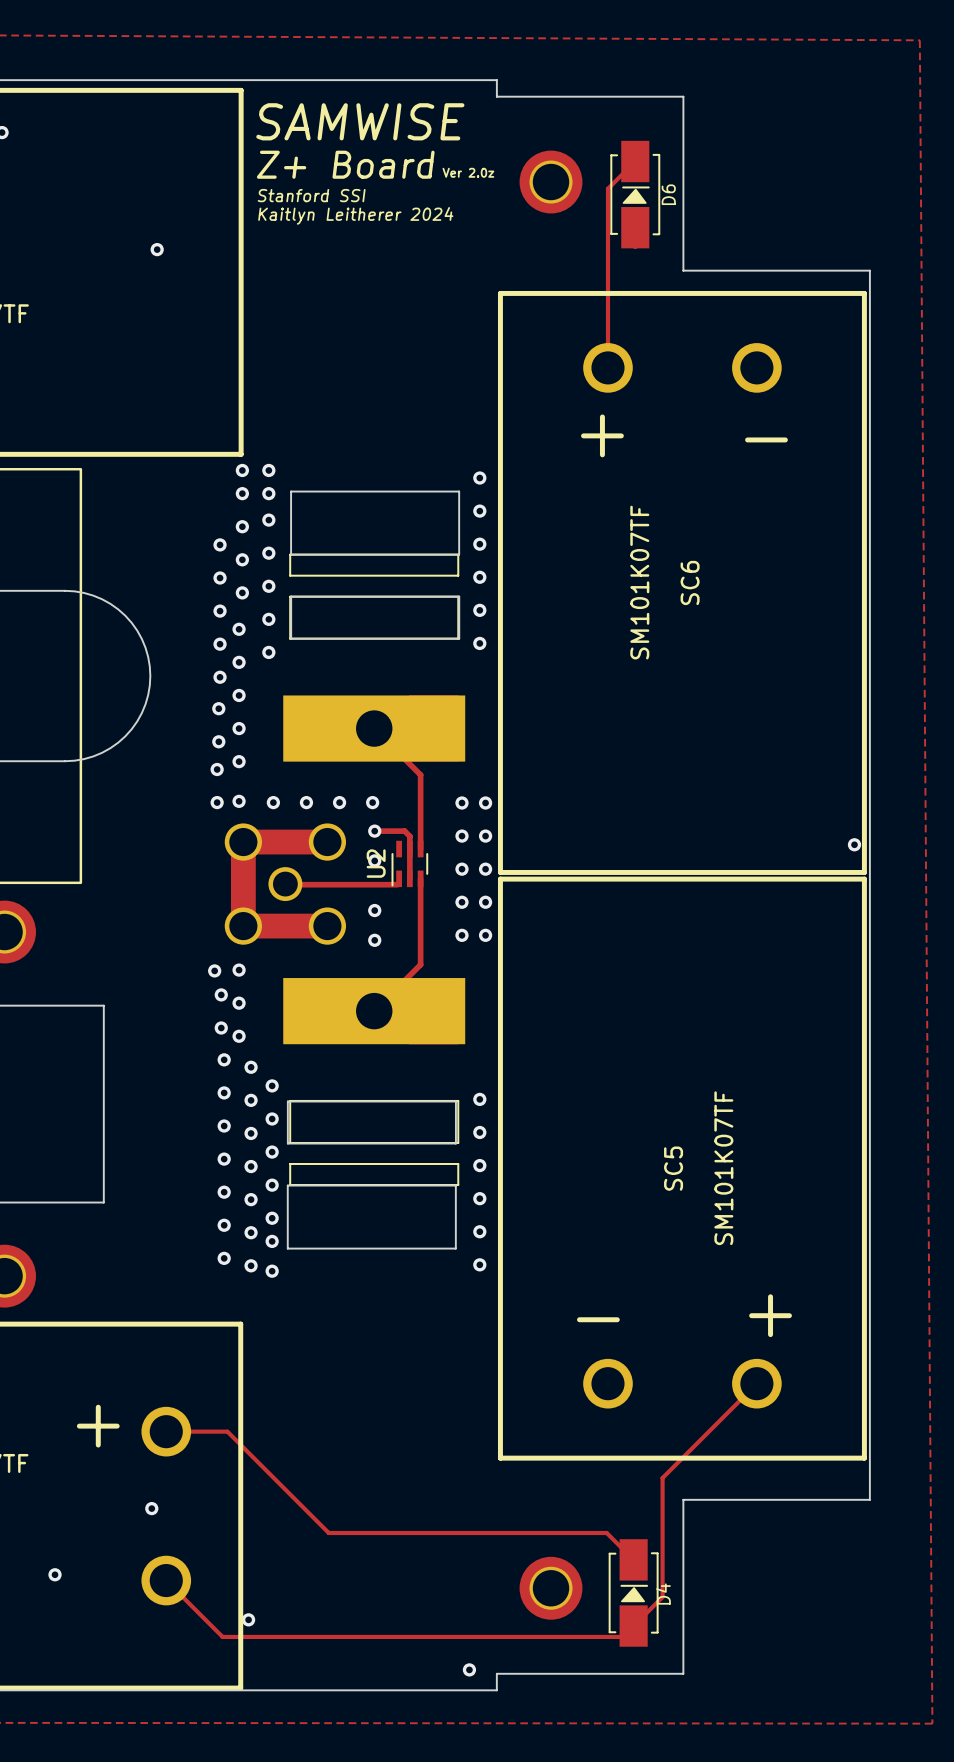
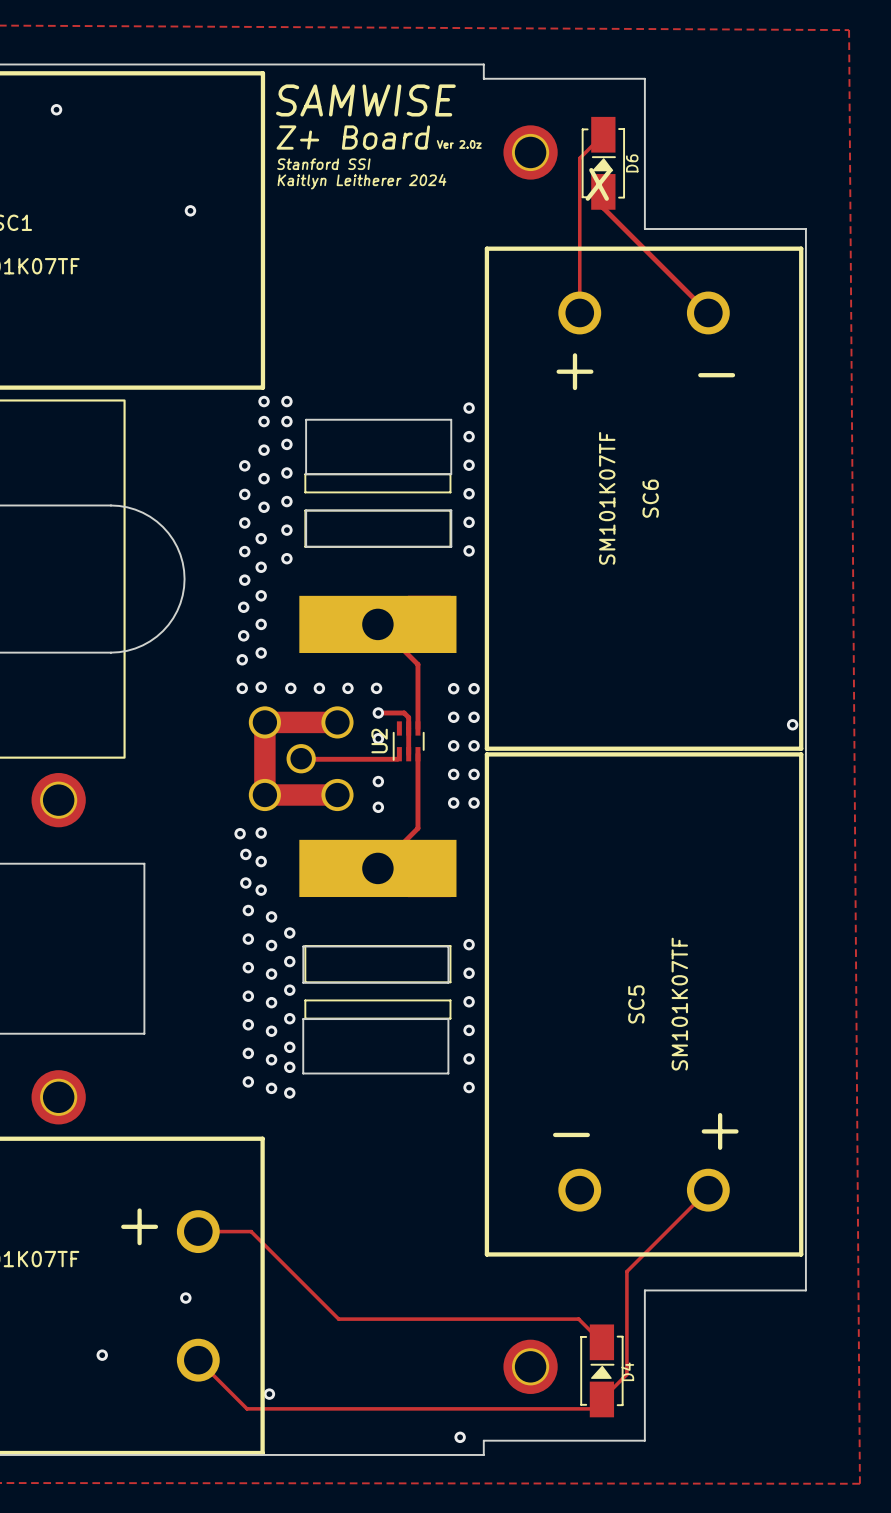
text: none -> X (599, 184)
track: none -> (603, 207) (708, 312)

